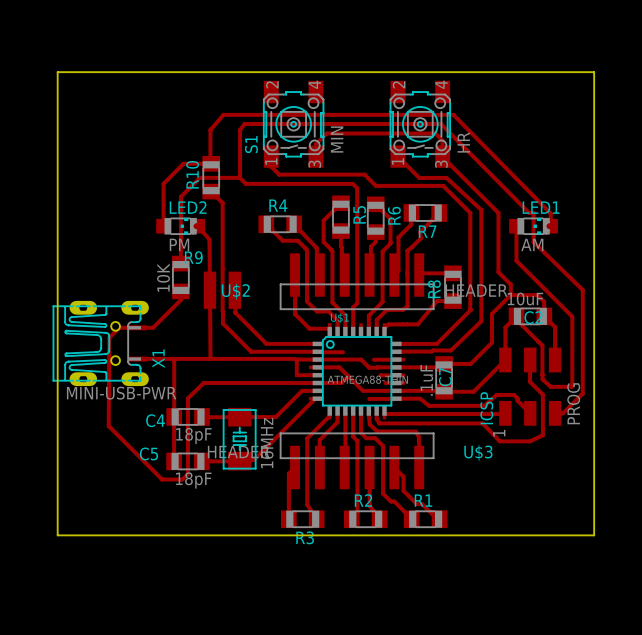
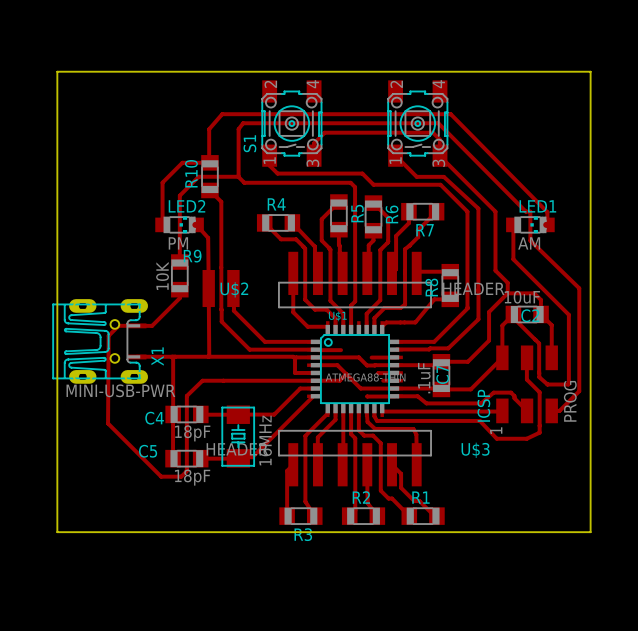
S1 value: MIN (337, 139) -> none
part value: HR (463, 142) -> none

